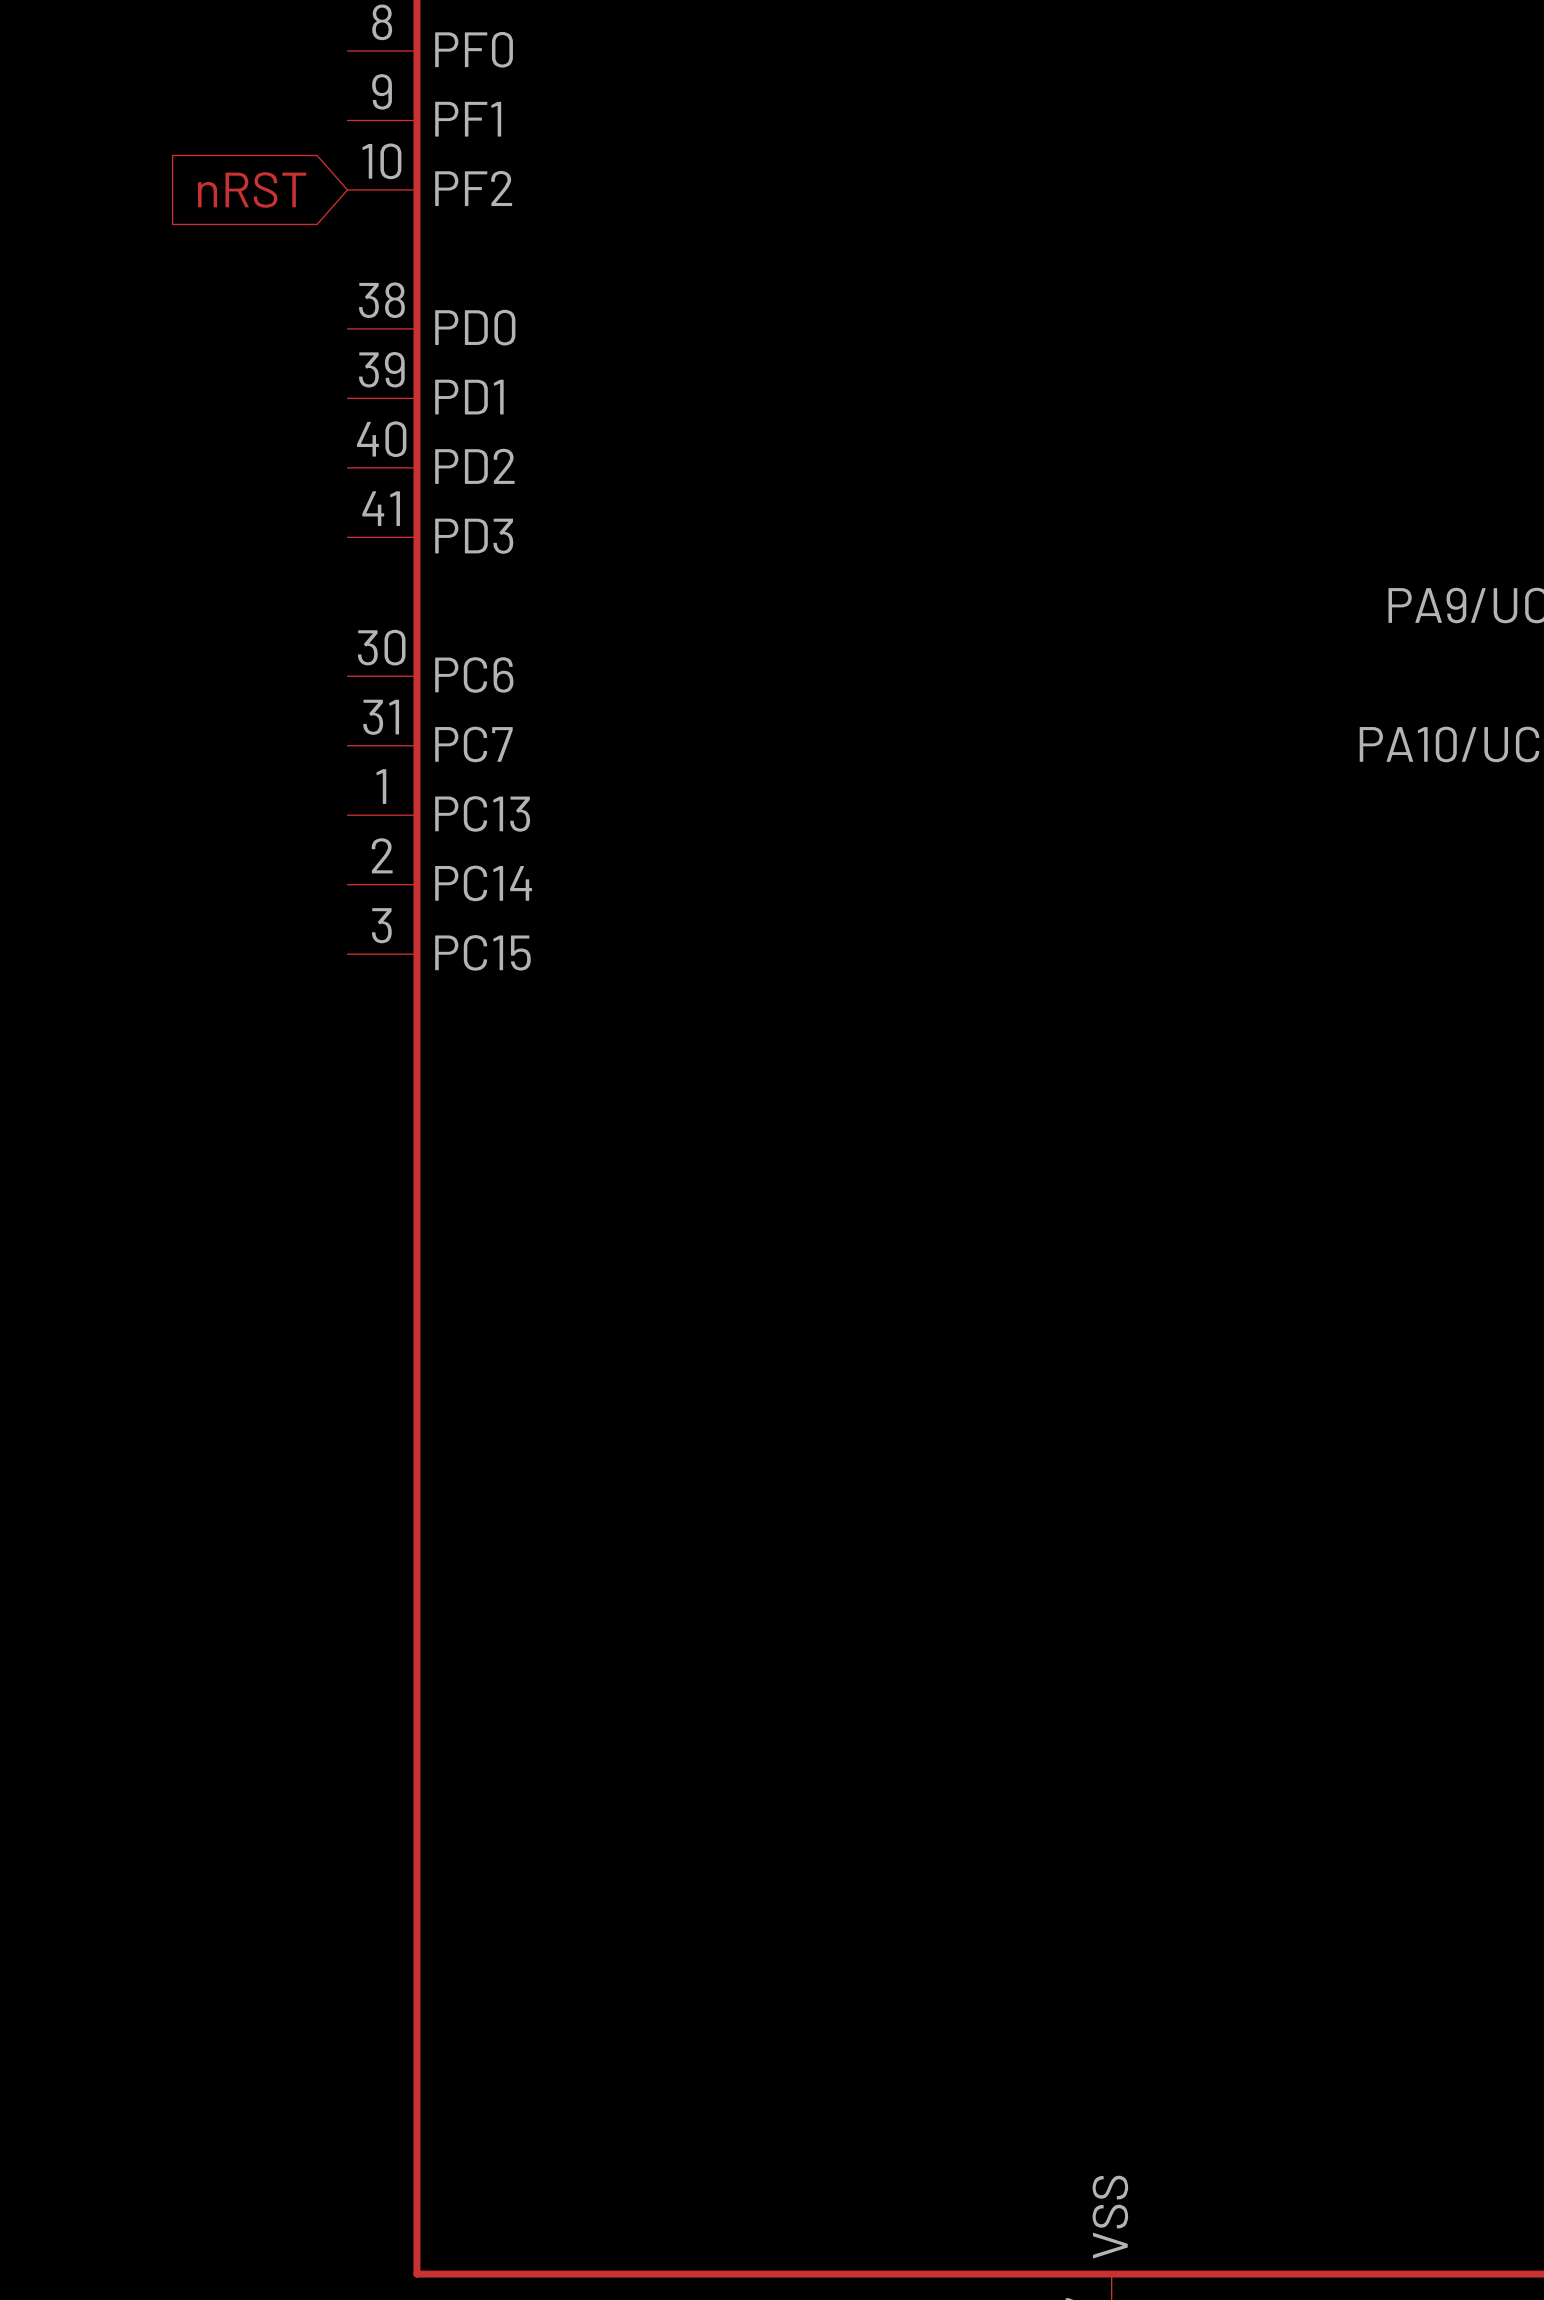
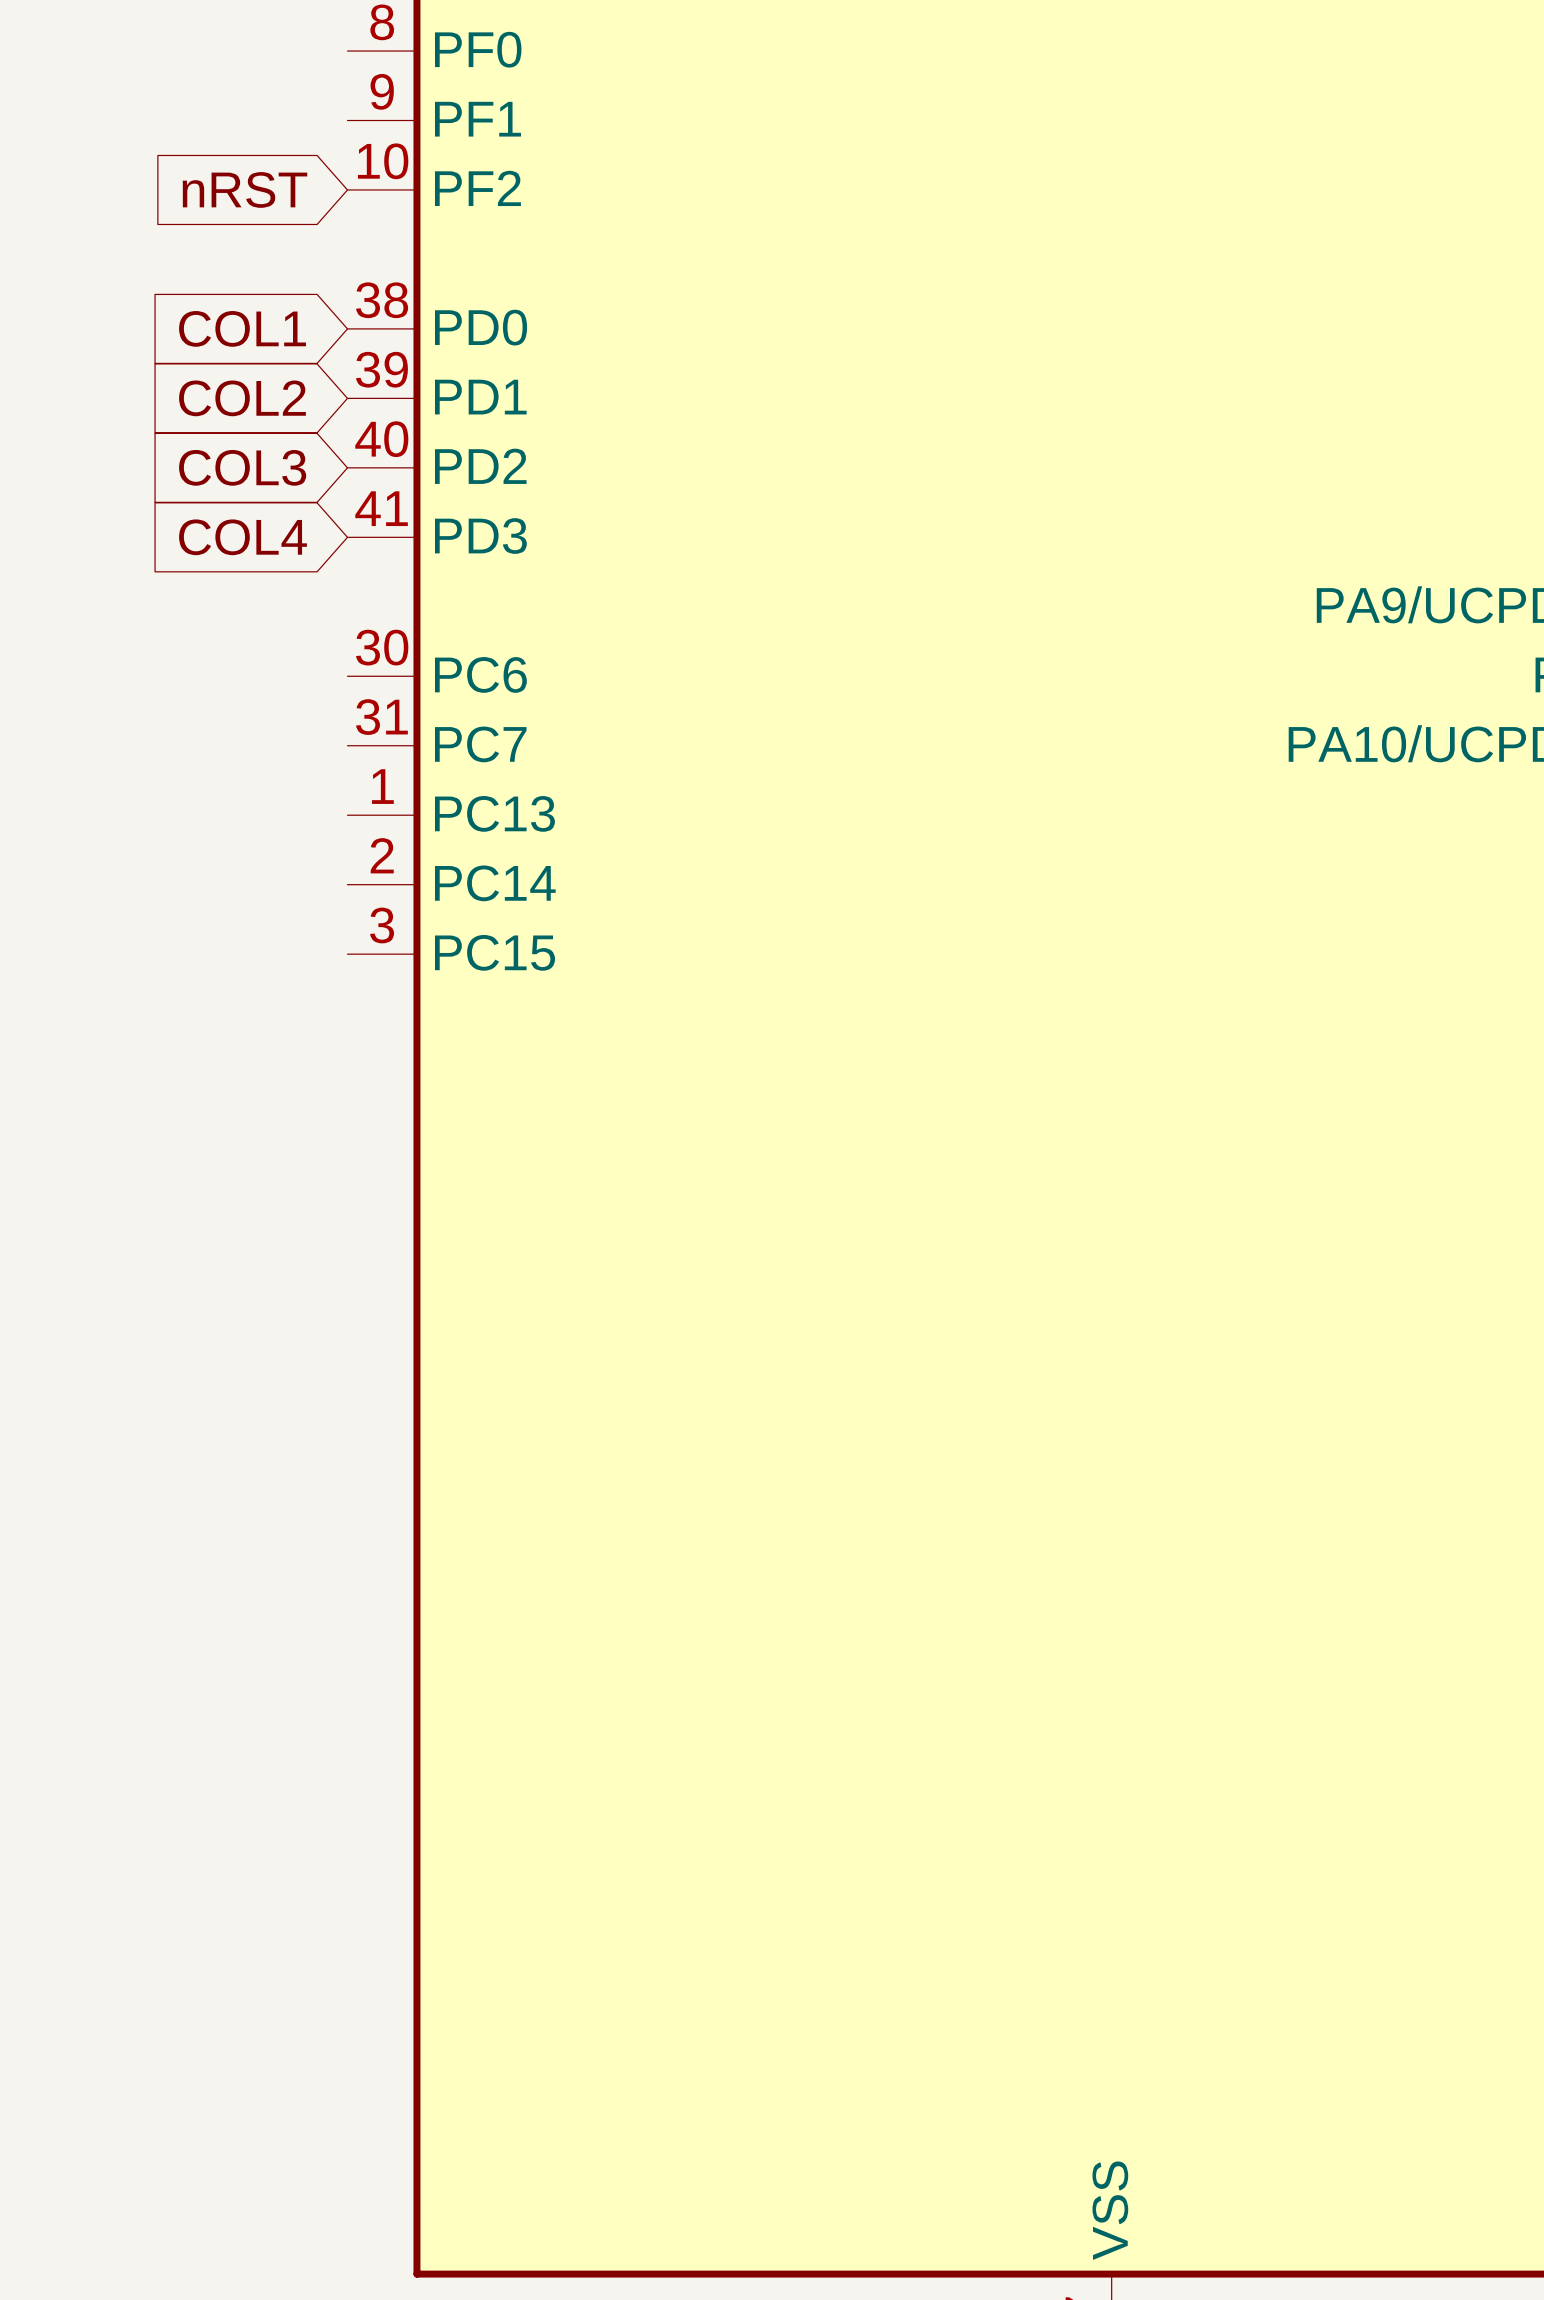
global label: none -> COL1 (242, 328)
global label: none -> COL2 (242, 398)
global label: none -> COL3 (242, 467)
global label: none -> COL4 (243, 537)

